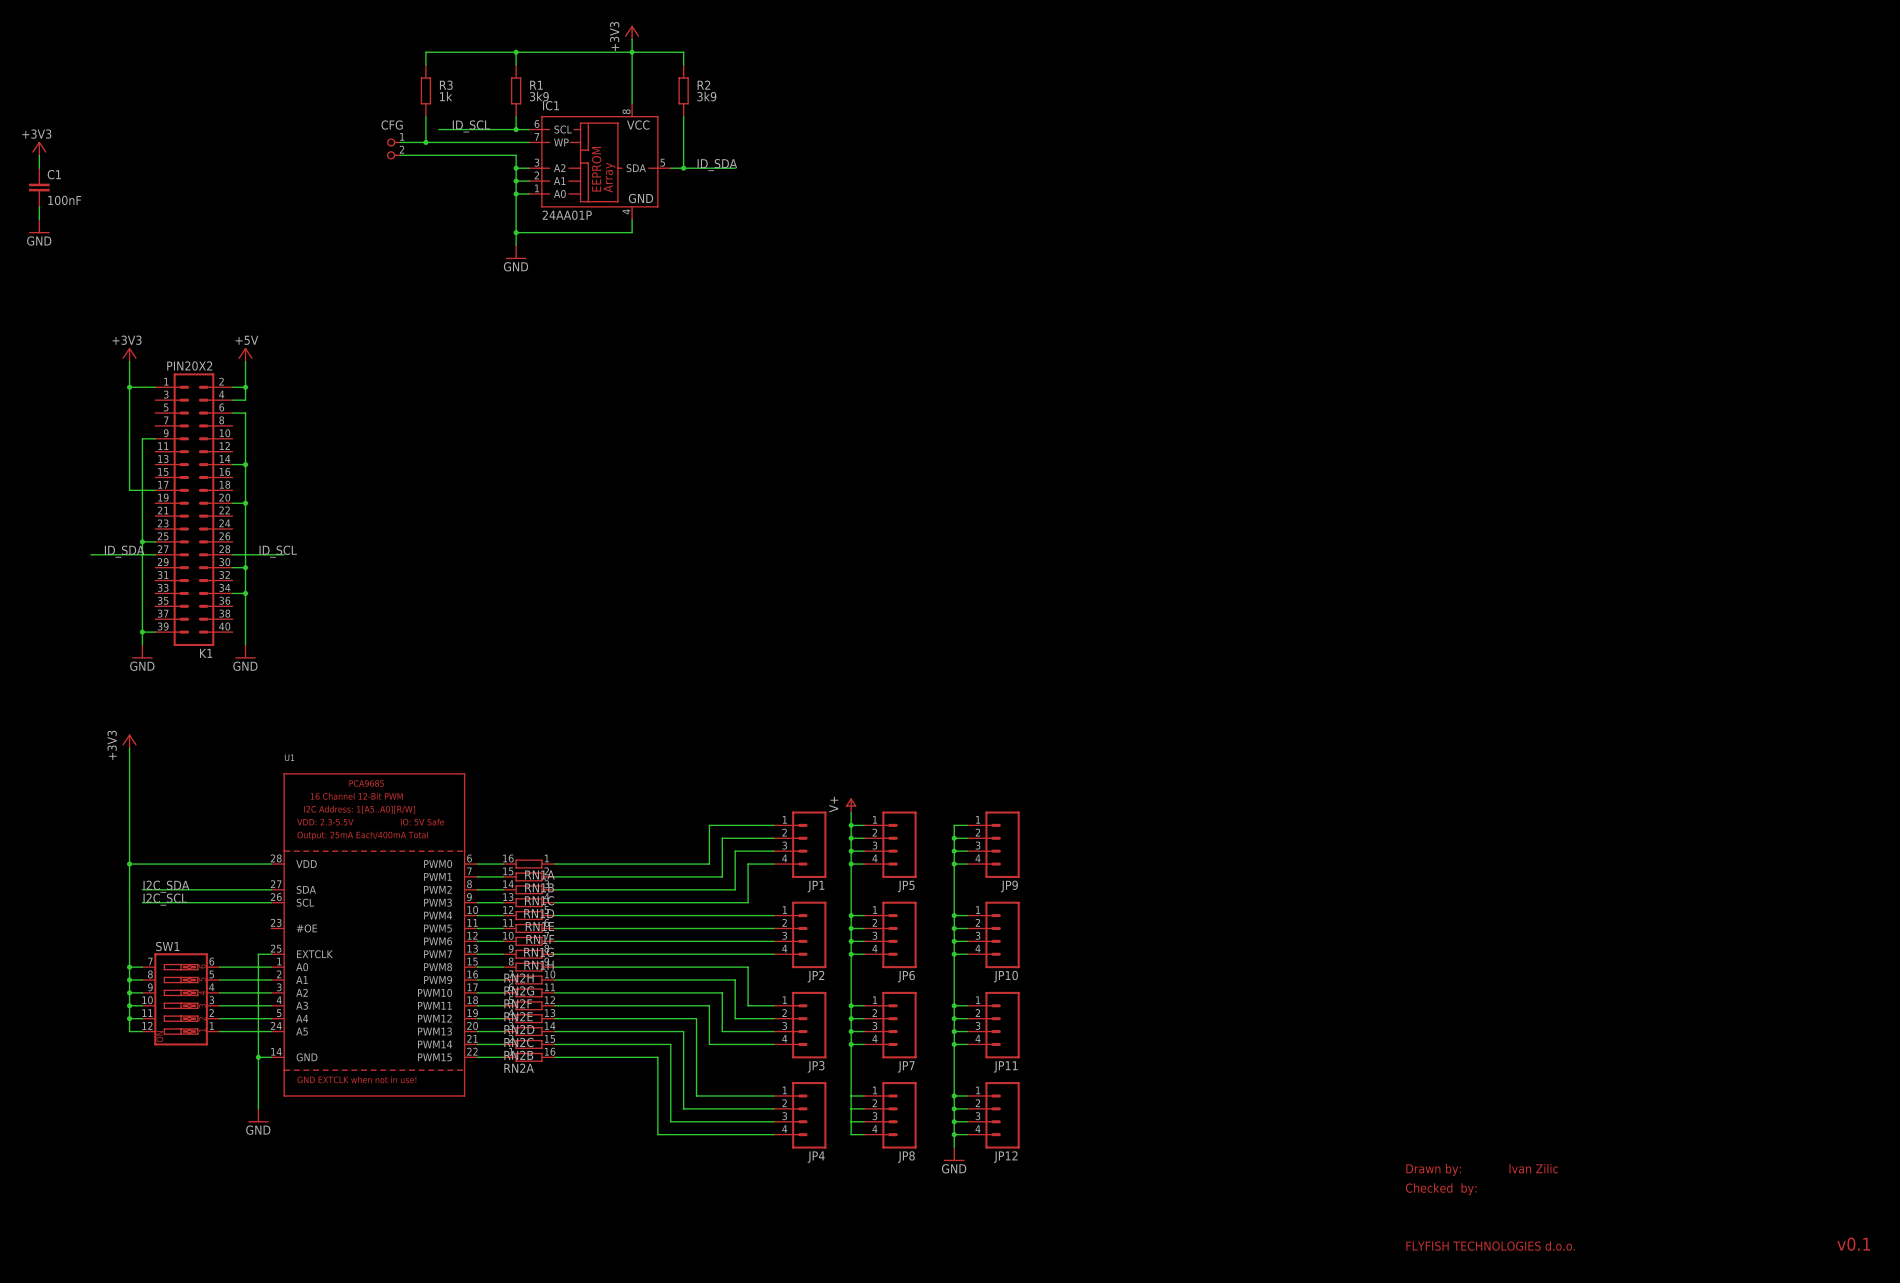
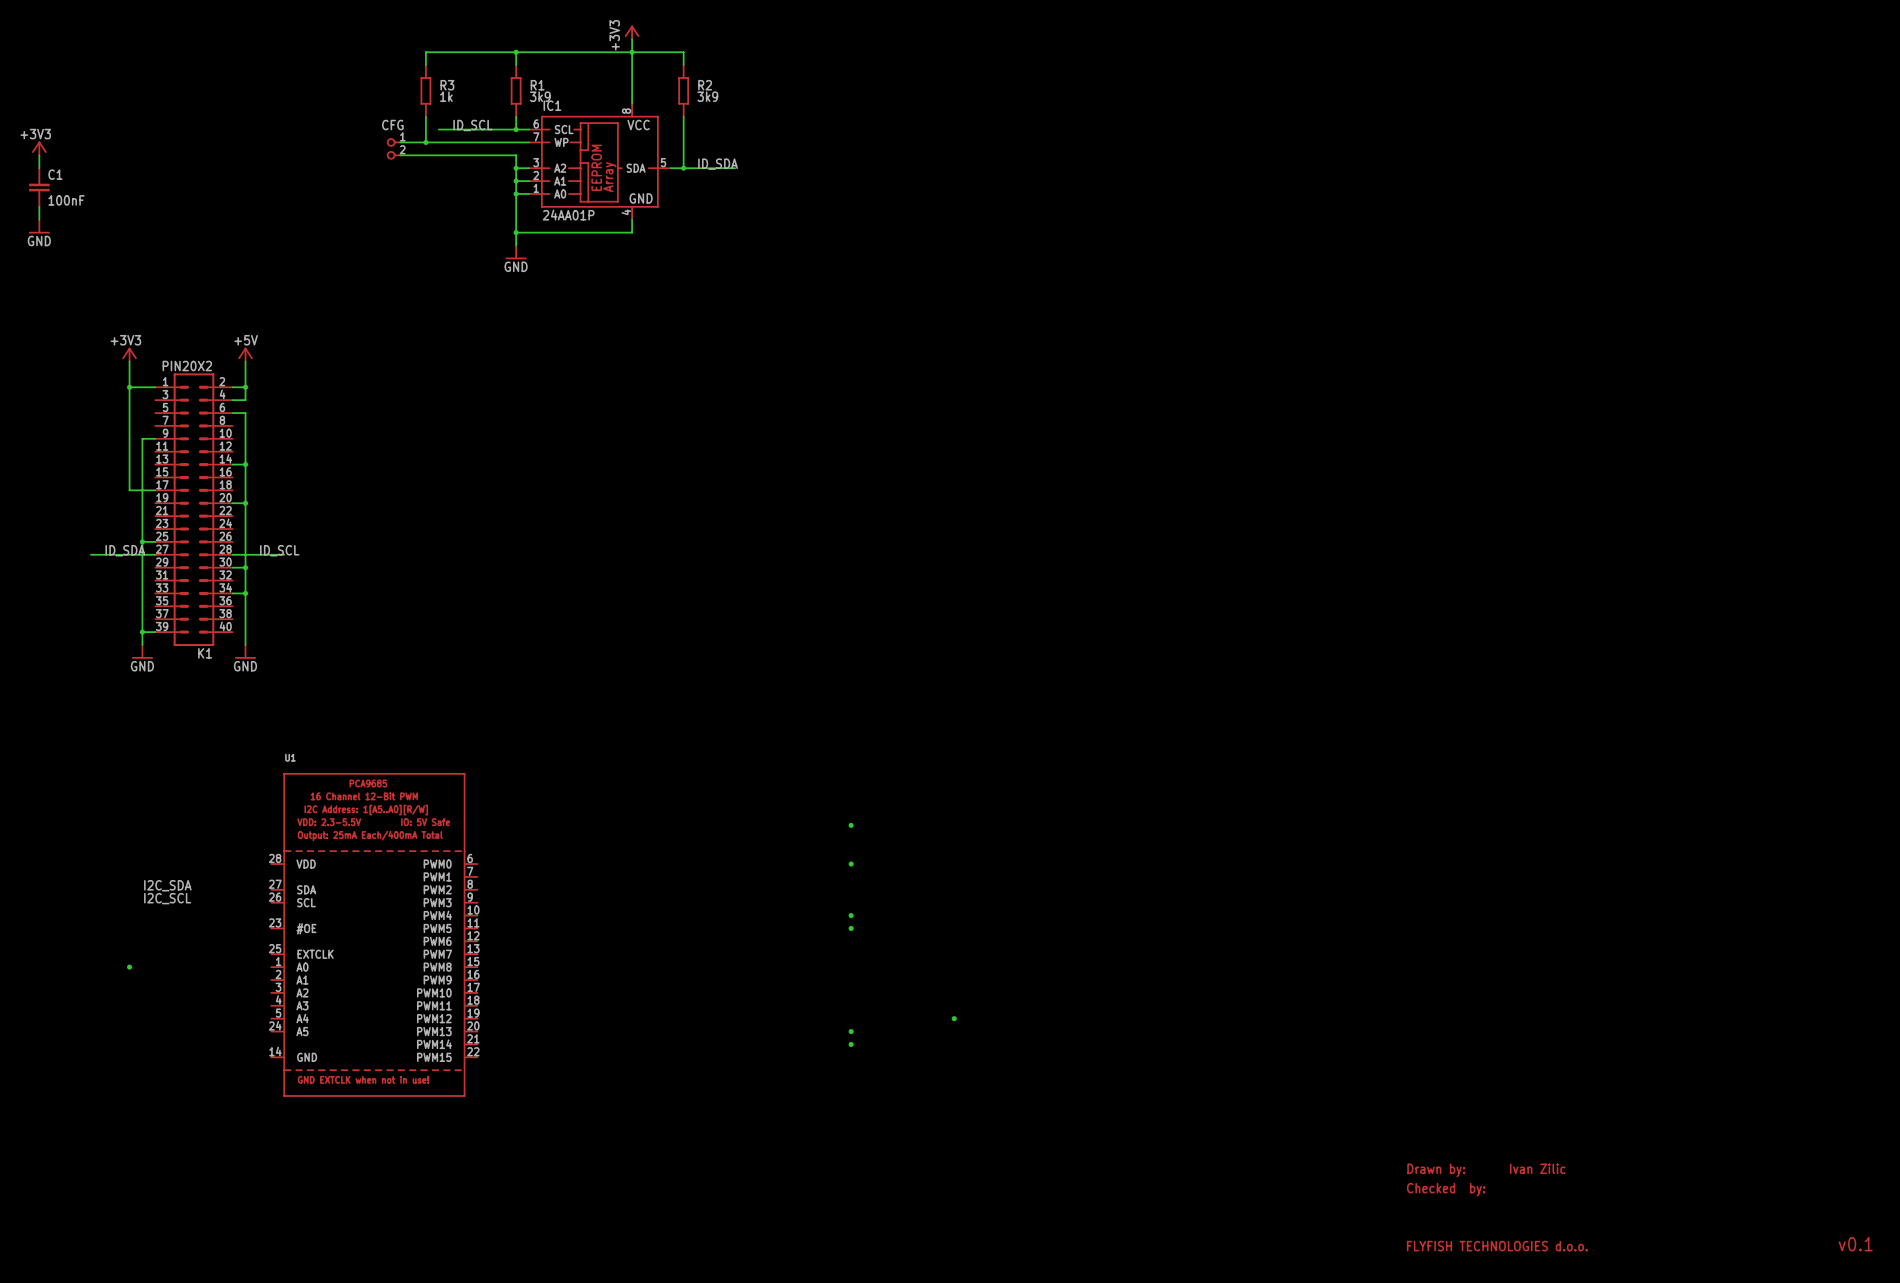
power symbol: +3V3 (129, 741) -> none
wire: (129, 748) (129, 1031) (142, 1031) -> none
power symbol: V+ (851, 805) -> none
wire: (851, 812) (851, 1134) (864, 1134) -> none
wire: (773, 825) (709, 825) (709, 864) (554, 864) -> none
wire: (851, 825) (864, 825) -> none
wire: (967, 825) (954, 825) (954, 1147) -> none
wire: (773, 838) (722, 838) (722, 876) (554, 876) -> none
wire: (851, 838) (864, 838) -> none
junction: (851, 838) -> none
wire: (954, 838) (967, 838) -> none
junction: (954, 838) -> none
JP1: (800, 844) -> none
JP5: (890, 844) -> none
JP9: (993, 844) -> none
wire: (773, 851) (735, 851) (735, 889) (554, 889) -> none
wire: (851, 851) (864, 851) -> none
junction: (851, 851) -> none
wire: (954, 851) (967, 851) -> none
junction: (954, 851) -> none
wire: (129, 864) (271, 864) -> none
junction: (129, 864) -> none
wire: (477, 864) (503, 864) -> none
RN1A: (529, 864) -> none
wire: (773, 864) (748, 864) (748, 902) (554, 902) -> none
wire: (851, 864) (864, 864) -> none
wire: (954, 864) (967, 864) -> none
junction: (954, 864) -> none
wire: (477, 876) (503, 876) -> none
RN1B: (529, 876) -> none
wire: (142, 889) (271, 889) -> none
wire: (477, 889) (503, 889) -> none
RN1C: (529, 889) -> none
wire: (142, 902) (271, 902) -> none
wire: (477, 902) (503, 902) -> none
RN1D: (529, 902) -> none
wire: (477, 915) (503, 915) -> none
RN1E: (529, 915) -> none
wire: (554, 915) (773, 915) -> none
wire: (851, 915) (864, 915) -> none
wire: (954, 915) (967, 915) -> none
junction: (954, 915) -> none
wire: (477, 928) (503, 928) -> none
RN1F: (529, 928) -> none
wire: (554, 928) (773, 928) -> none
wire: (851, 928) (864, 928) -> none
wire: (954, 928) (967, 928) -> none
junction: (954, 928) -> none
JP2: (800, 934) -> none
JP6: (890, 934) -> none
JP10: (993, 934) -> none
wire: (477, 941) (503, 941) -> none
RN1G: (529, 941) -> none
wire: (554, 941) (773, 941) -> none
wire: (851, 941) (864, 941) -> none
junction: (851, 941) -> none
wire: (954, 941) (967, 941) -> none
junction: (954, 941) -> none
wire: (271, 954) (258, 954) (258, 1108) -> none
wire: (477, 954) (503, 954) -> none
RN1H: (529, 954) -> none
wire: (554, 954) (773, 954) -> none
wire: (851, 954) (864, 954) -> none
junction: (851, 954) -> none
wire: (954, 954) (967, 954) -> none
junction: (954, 954) -> none
wire: (129, 967) (142, 967) -> none
wire: (219, 967) (271, 967) -> none
wire: (477, 967) (503, 967) -> none
RN2H: (529, 967) -> none
wire: (554, 967) (748, 967) (748, 1005) (773, 1005) -> none
wire: (129, 980) (142, 980) -> none
junction: (129, 980) -> none
wire: (219, 980) (271, 980) -> none
wire: (477, 980) (503, 980) -> none
RN2G: (529, 980) -> none
wire: (554, 980) (735, 980) (735, 1018) (773, 1018) -> none
wire: (129, 992) (142, 992) -> none
junction: (129, 992) -> none
wire: (219, 992) (271, 992) -> none
wire: (477, 992) (503, 992) -> none
RN2F: (529, 992) -> none
wire: (554, 992) (722, 992) (722, 1031) (773, 1031) -> none
SW1: (181, 999) -> none
wire: (129, 1005) (142, 1005) -> none
junction: (129, 1005) -> none
wire: (219, 1005) (271, 1005) -> none
wire: (477, 1005) (503, 1005) -> none
RN2E: (529, 1005) -> none
wire: (554, 1005) (709, 1005) (709, 1044) (773, 1044) -> none
wire: (851, 1005) (864, 1005) -> none
junction: (851, 1005) -> none
wire: (954, 1005) (967, 1005) -> none
junction: (954, 1005) -> none
wire: (129, 1018) (142, 1018) -> none
junction: (129, 1018) -> none
wire: (219, 1018) (271, 1018) -> none
wire: (477, 1018) (503, 1018) -> none
RN2D: (529, 1018) -> none
wire: (554, 1018) (696, 1018) (696, 1095) (773, 1095) -> none
wire: (851, 1018) (864, 1018) -> none
junction: (851, 1018) -> none
wire: (954, 1018) (967, 1018) -> none
JP3: (800, 1025) -> none
JP7: (890, 1025) -> none
JP11: (993, 1025) -> none
wire: (219, 1031) (271, 1031) -> none
wire: (477, 1031) (503, 1031) -> none
RN2C: (529, 1031) -> none
wire: (554, 1031) (683, 1031) (683, 1108) (773, 1108) -> none
wire: (851, 1031) (864, 1031) -> none
wire: (954, 1031) (967, 1031) -> none
junction: (954, 1031) -> none
wire: (477, 1044) (503, 1044) -> none
RN2B: (529, 1044) -> none
wire: (554, 1044) (670, 1044) (670, 1121) (773, 1121) -> none
wire: (851, 1044) (864, 1044) -> none
wire: (954, 1044) (967, 1044) -> none
junction: (954, 1044) -> none
wire: (258, 1057) (271, 1057) -> none
junction: (258, 1057) -> none
wire: (477, 1057) (503, 1057) -> none
RN2A: (529, 1057) -> none
wire: (554, 1057) (657, 1057) (657, 1134) (773, 1134) -> none
wire: (851, 1095) (864, 1095) -> none
wire: (954, 1095) (967, 1095) -> none
junction: (954, 1095) -> none
wire: (851, 1108) (864, 1108) -> none
wire: (954, 1108) (967, 1108) -> none
junction: (954, 1108) -> none
power symbol: GND (258, 1115) -> none
JP4: (800, 1115) -> none
JP8: (890, 1115) -> none
JP12: (993, 1115) -> none
wire: (851, 1121) (864, 1121) -> none
wire: (954, 1121) (967, 1121) -> none
junction: (954, 1121) -> none
wire: (954, 1134) (967, 1134) -> none
junction: (954, 1134) -> none
power symbol: GND (954, 1154) -> none

